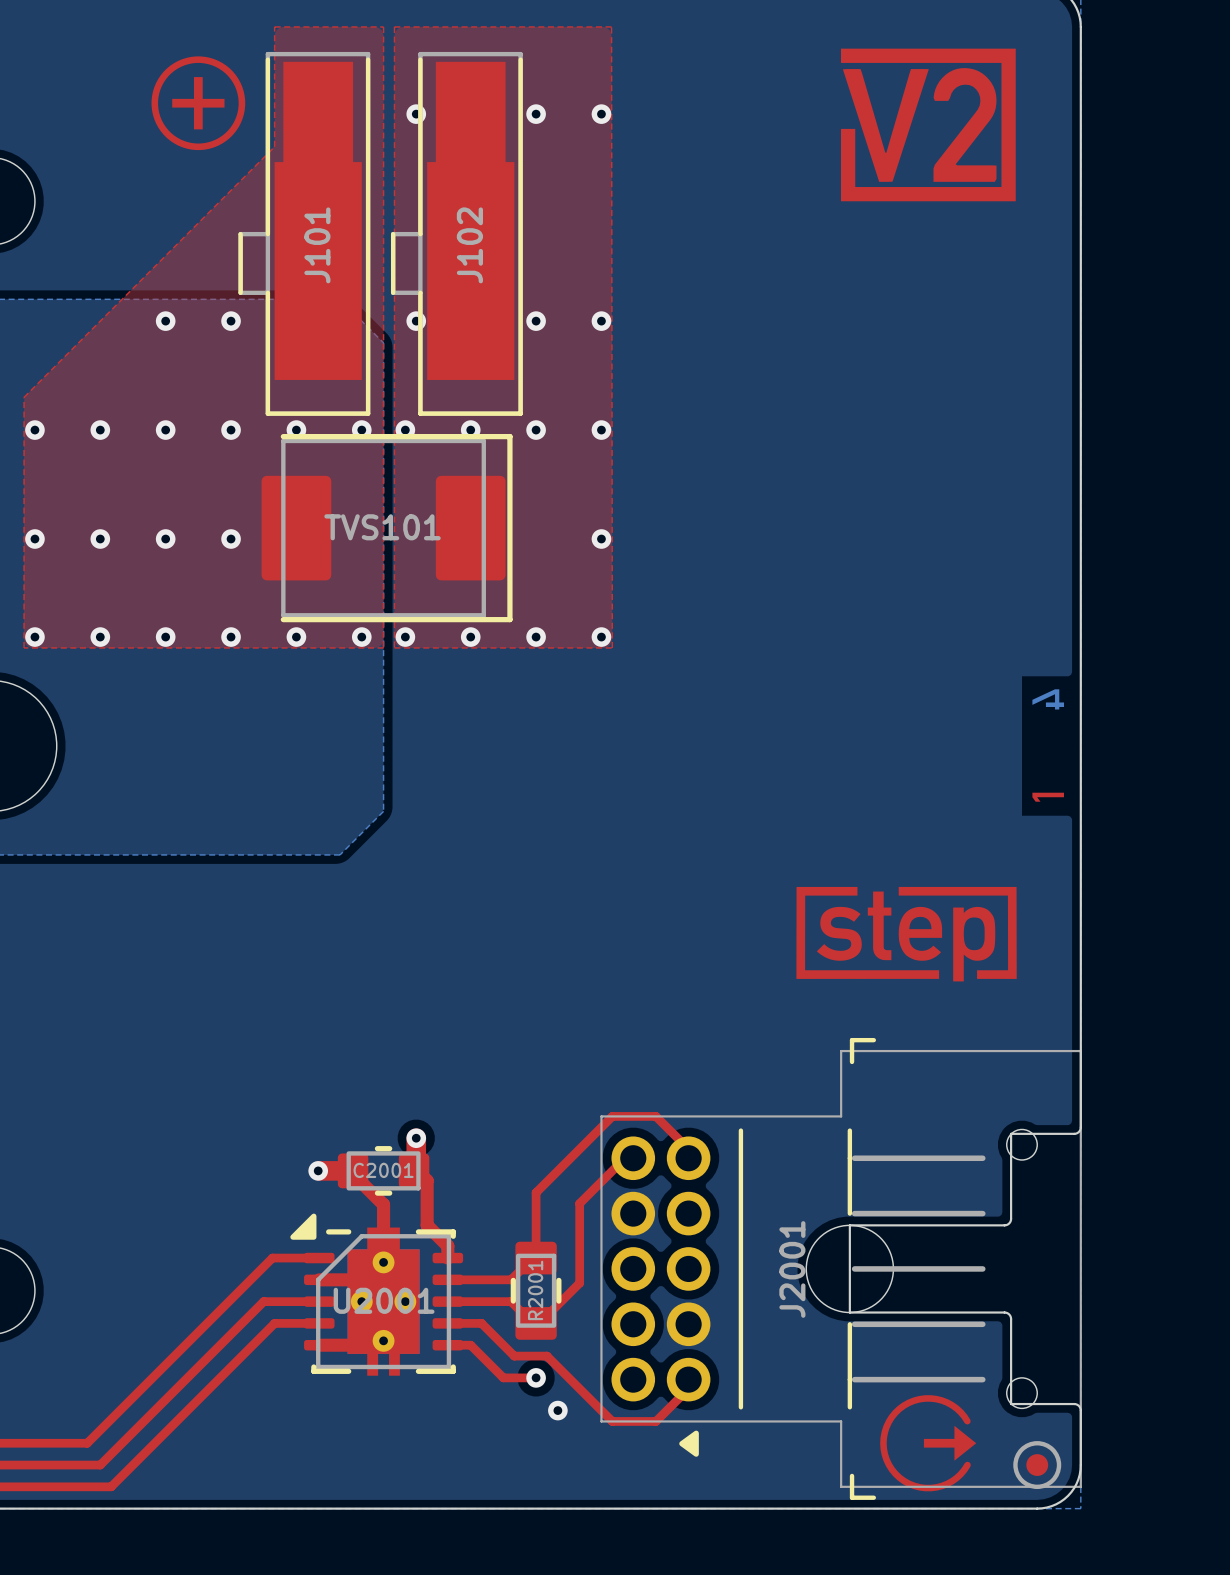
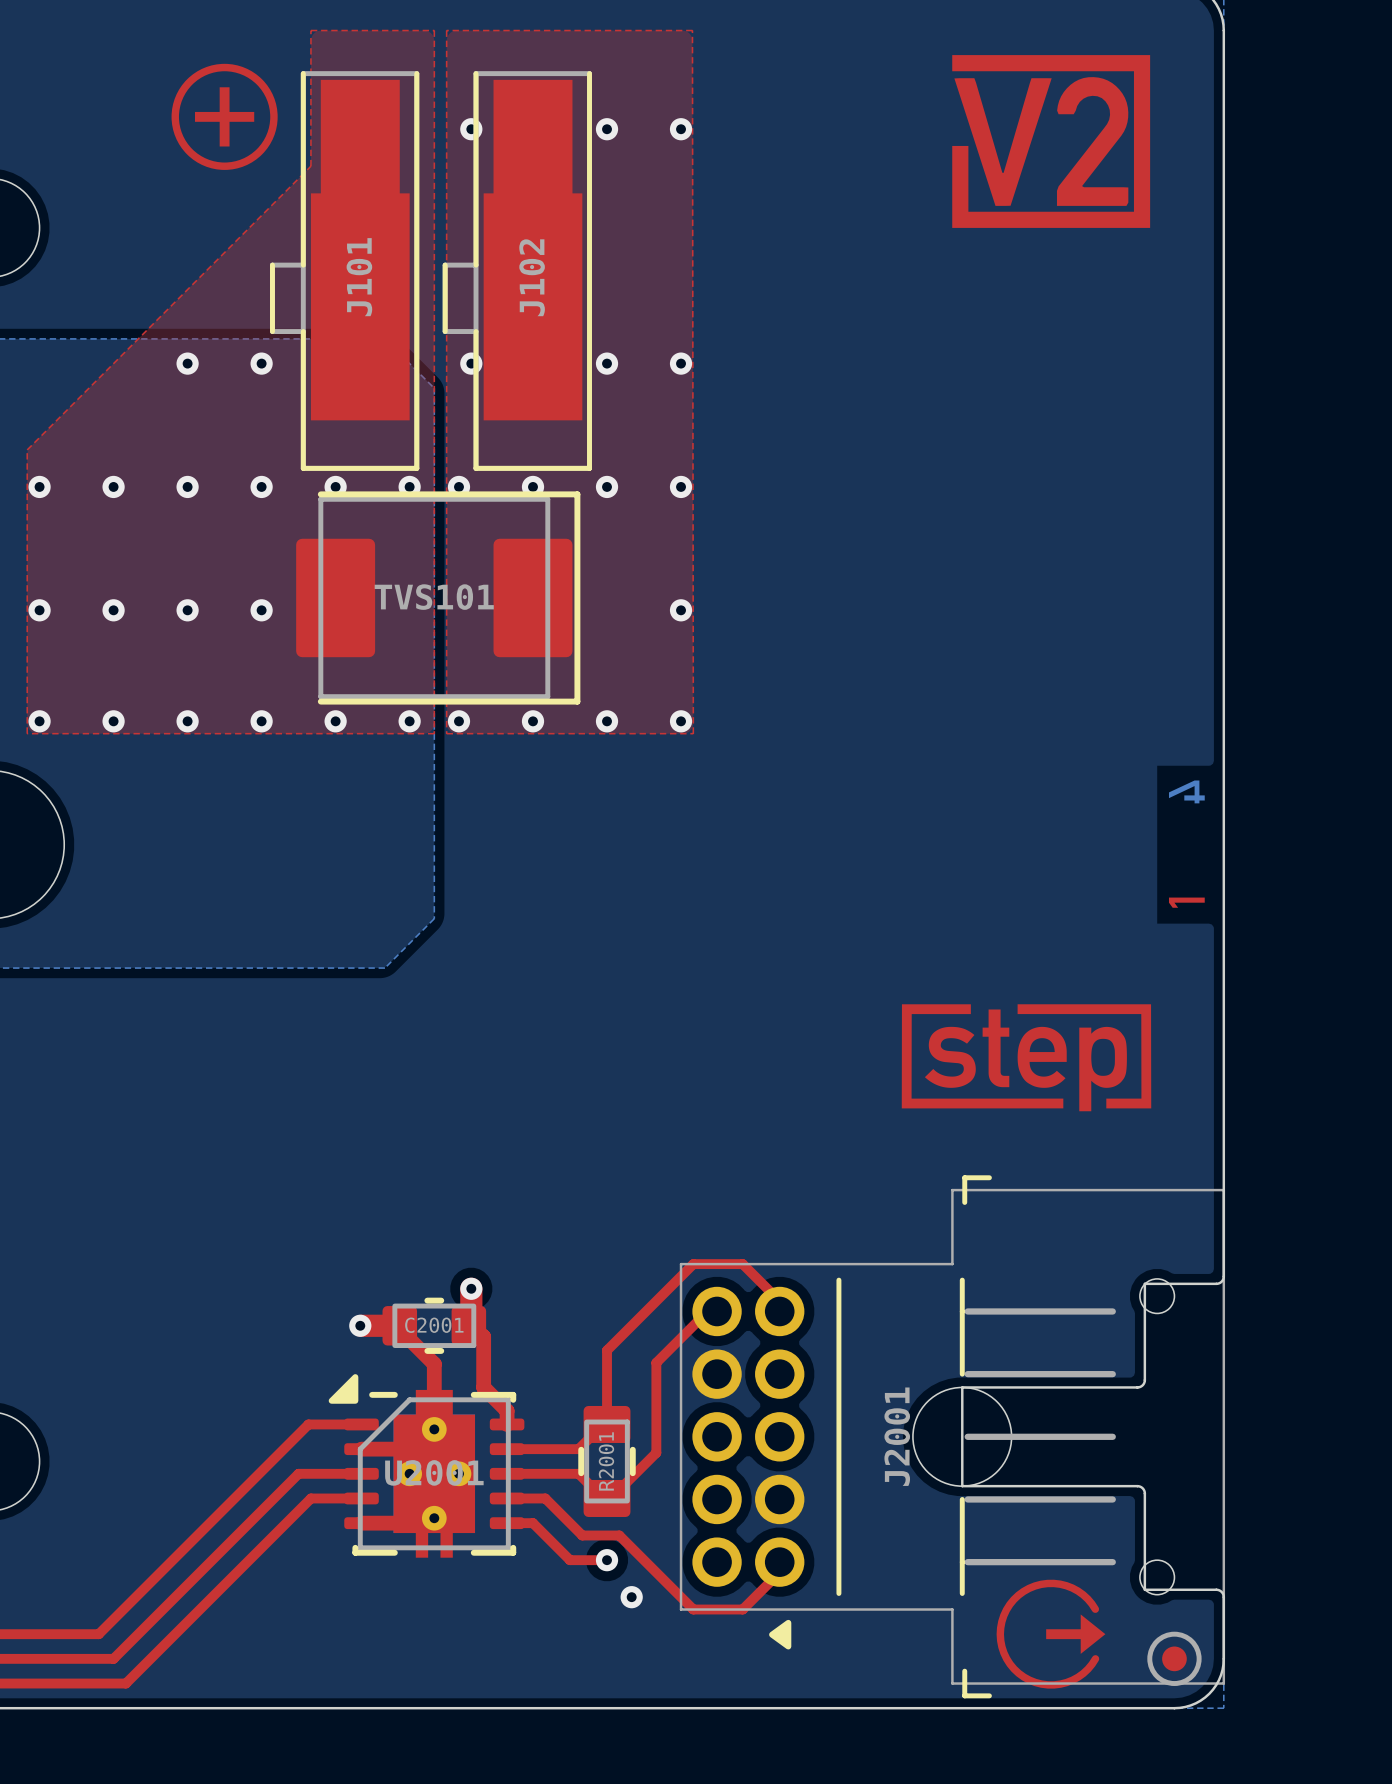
J101 footprint: [238, 51, 371, 416] -> [270, 71, 420, 471]
J102 footprint: [390, 51, 523, 416] -> [442, 71, 592, 471]

